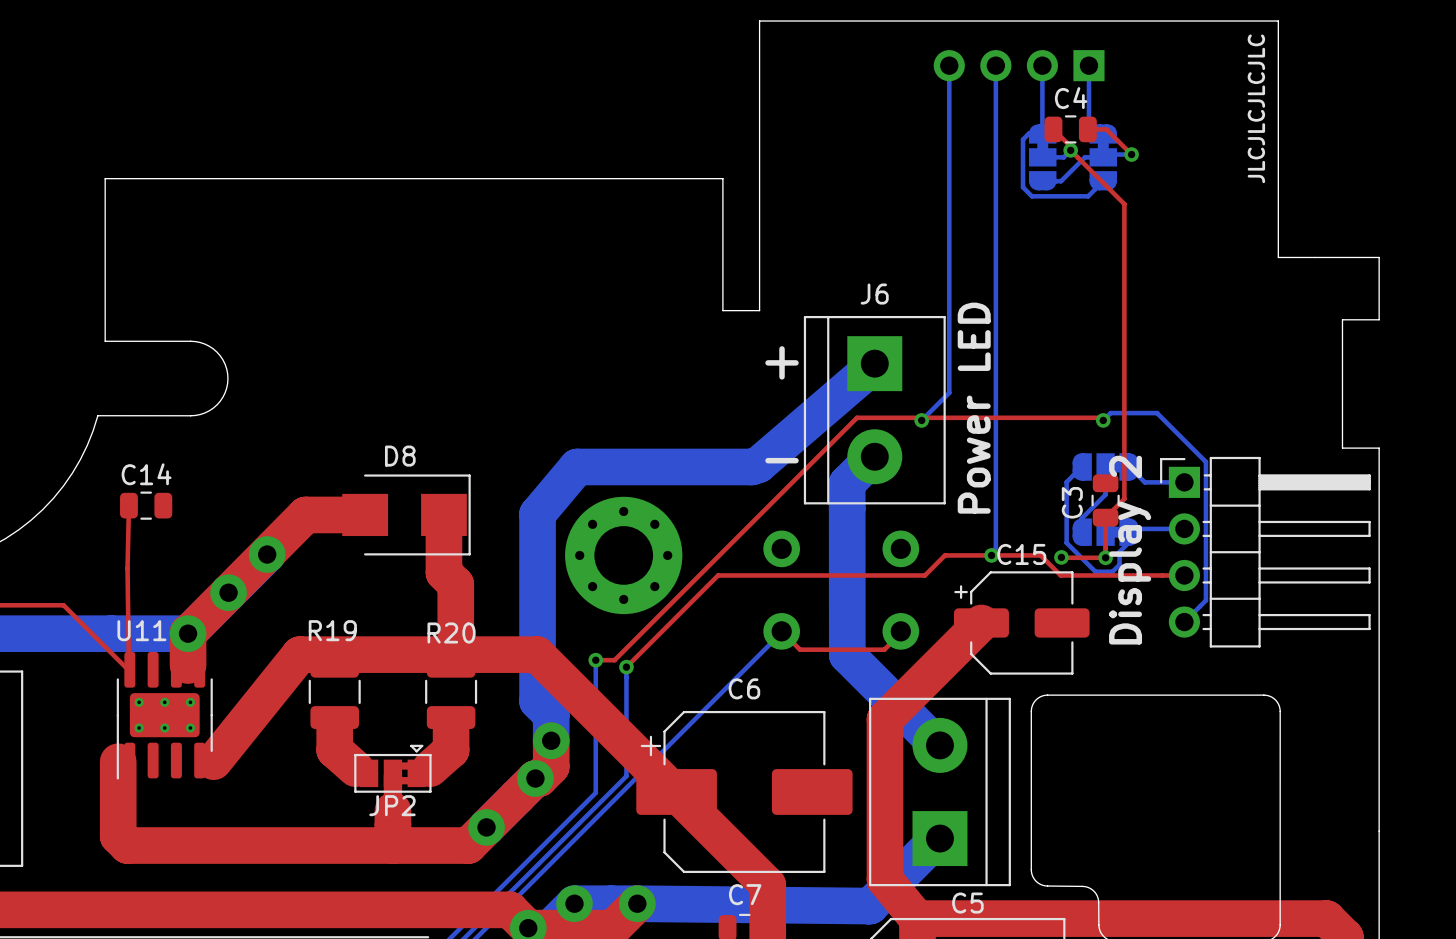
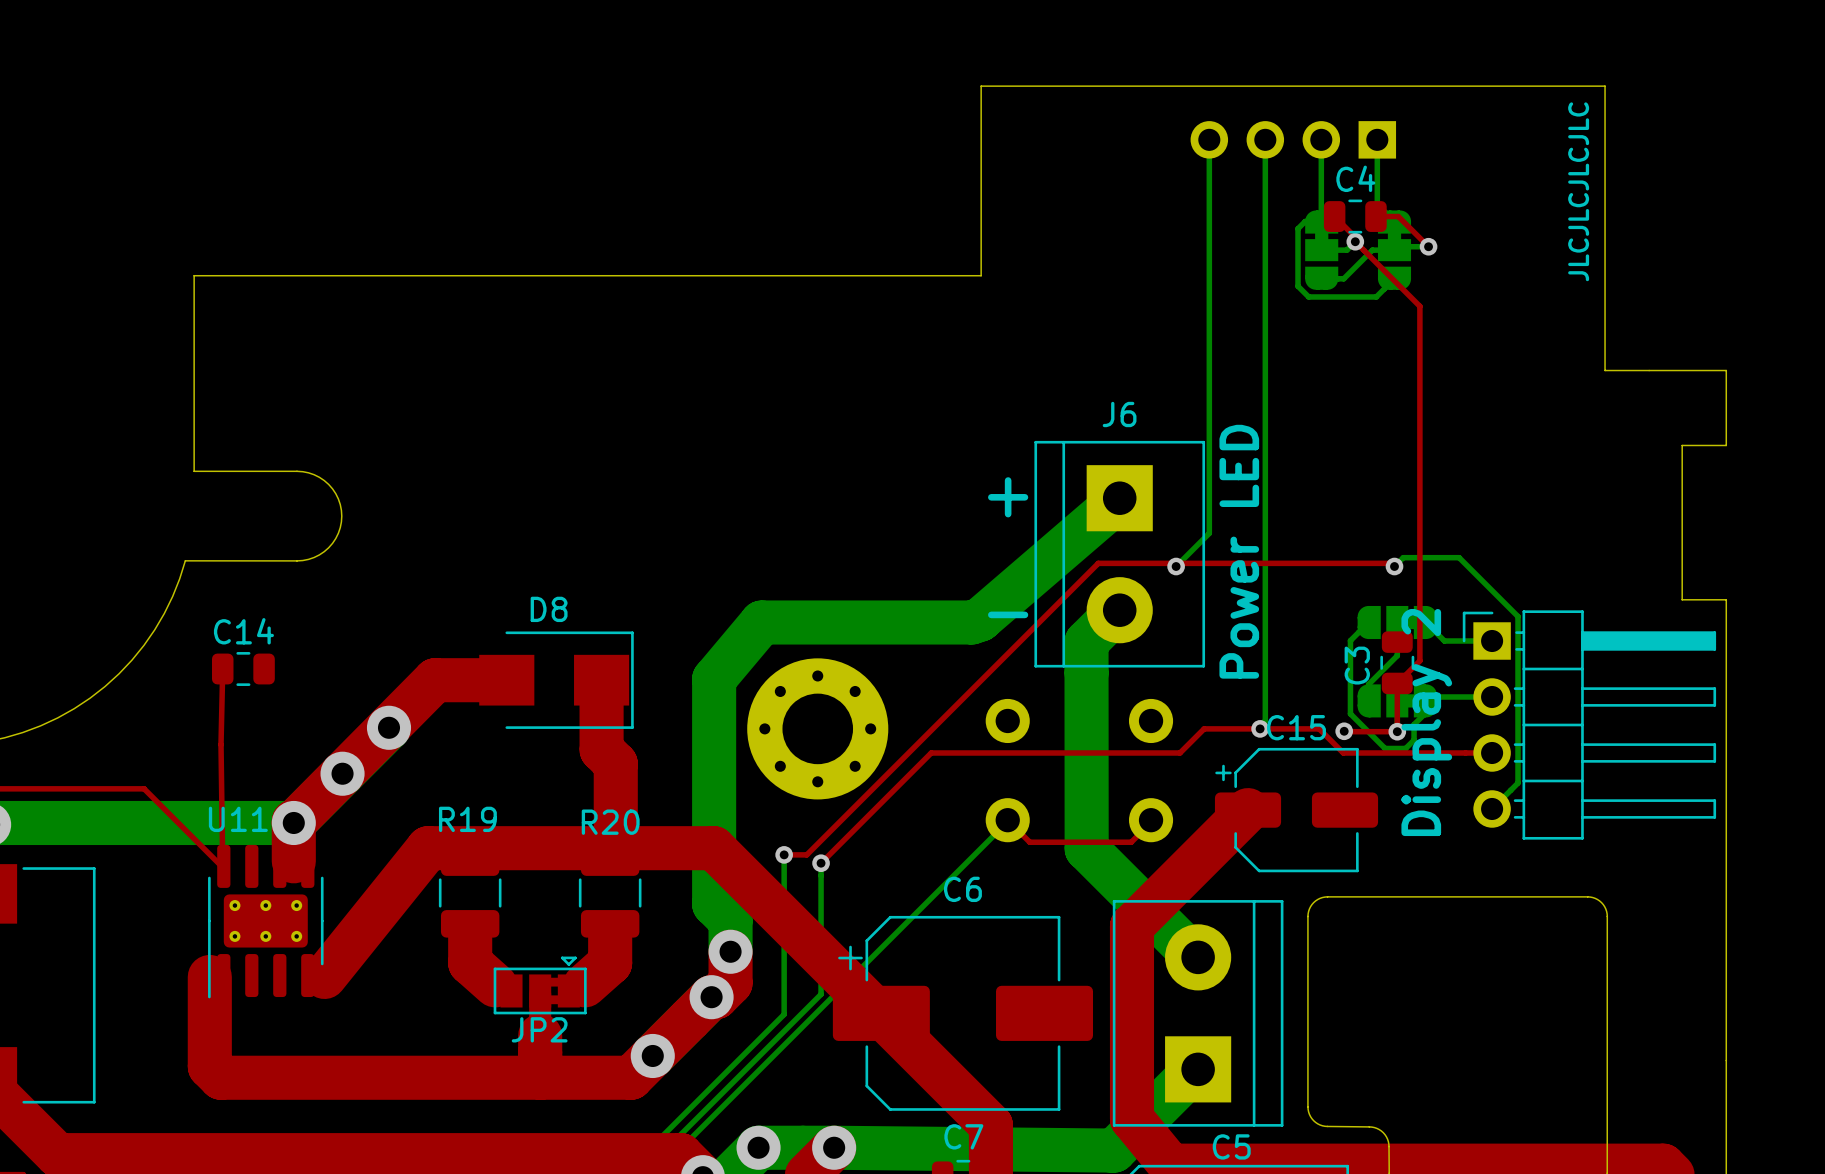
board edge: (722, 178) (722, 310) (759, 310) (759, 178) -> (937, 275) (981, 275)

